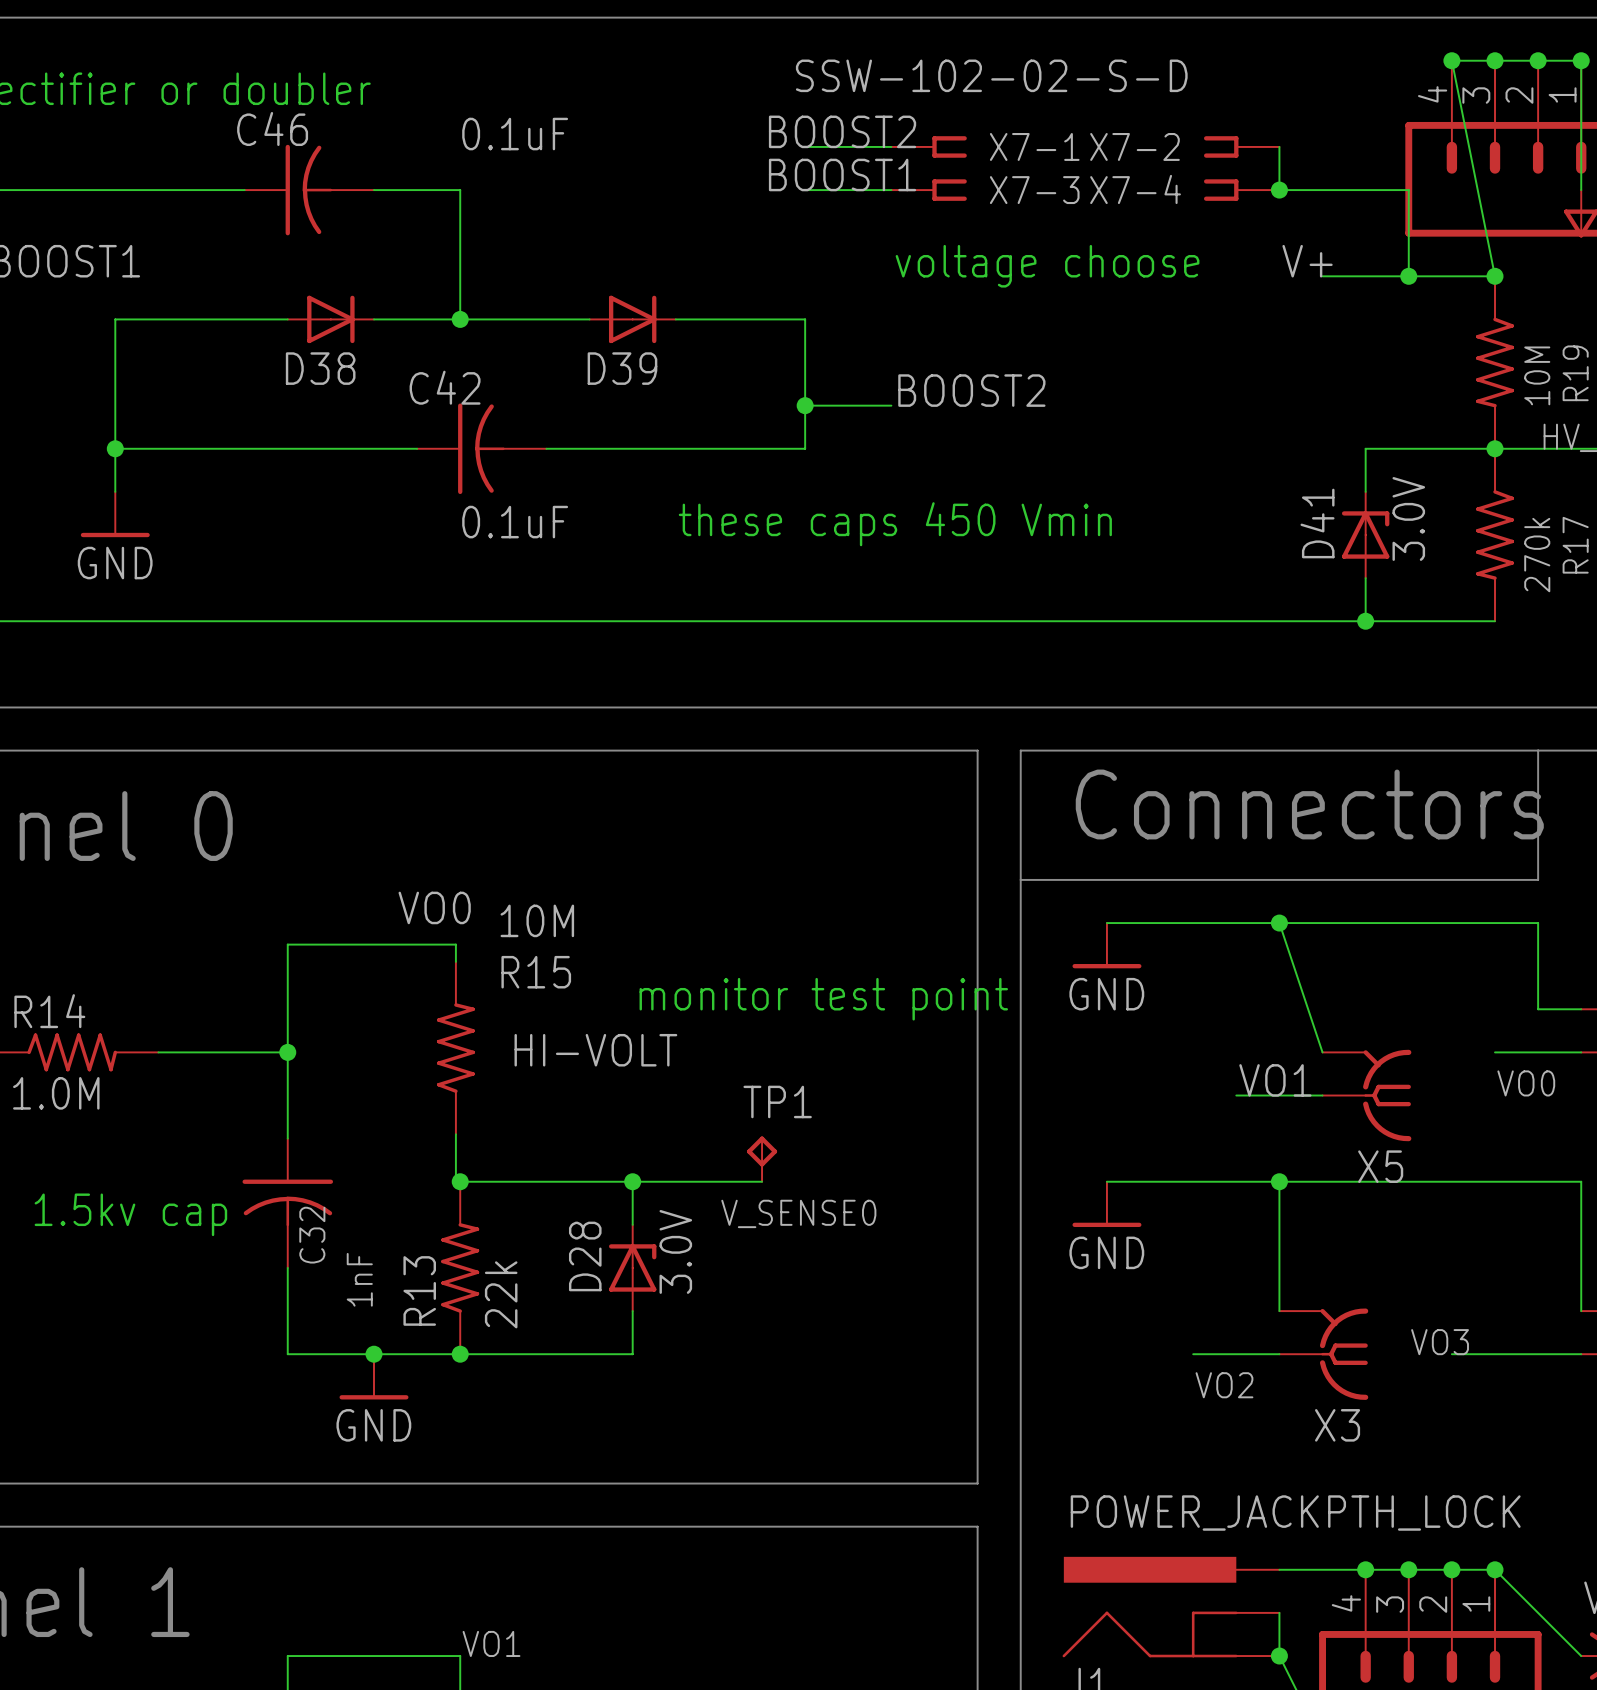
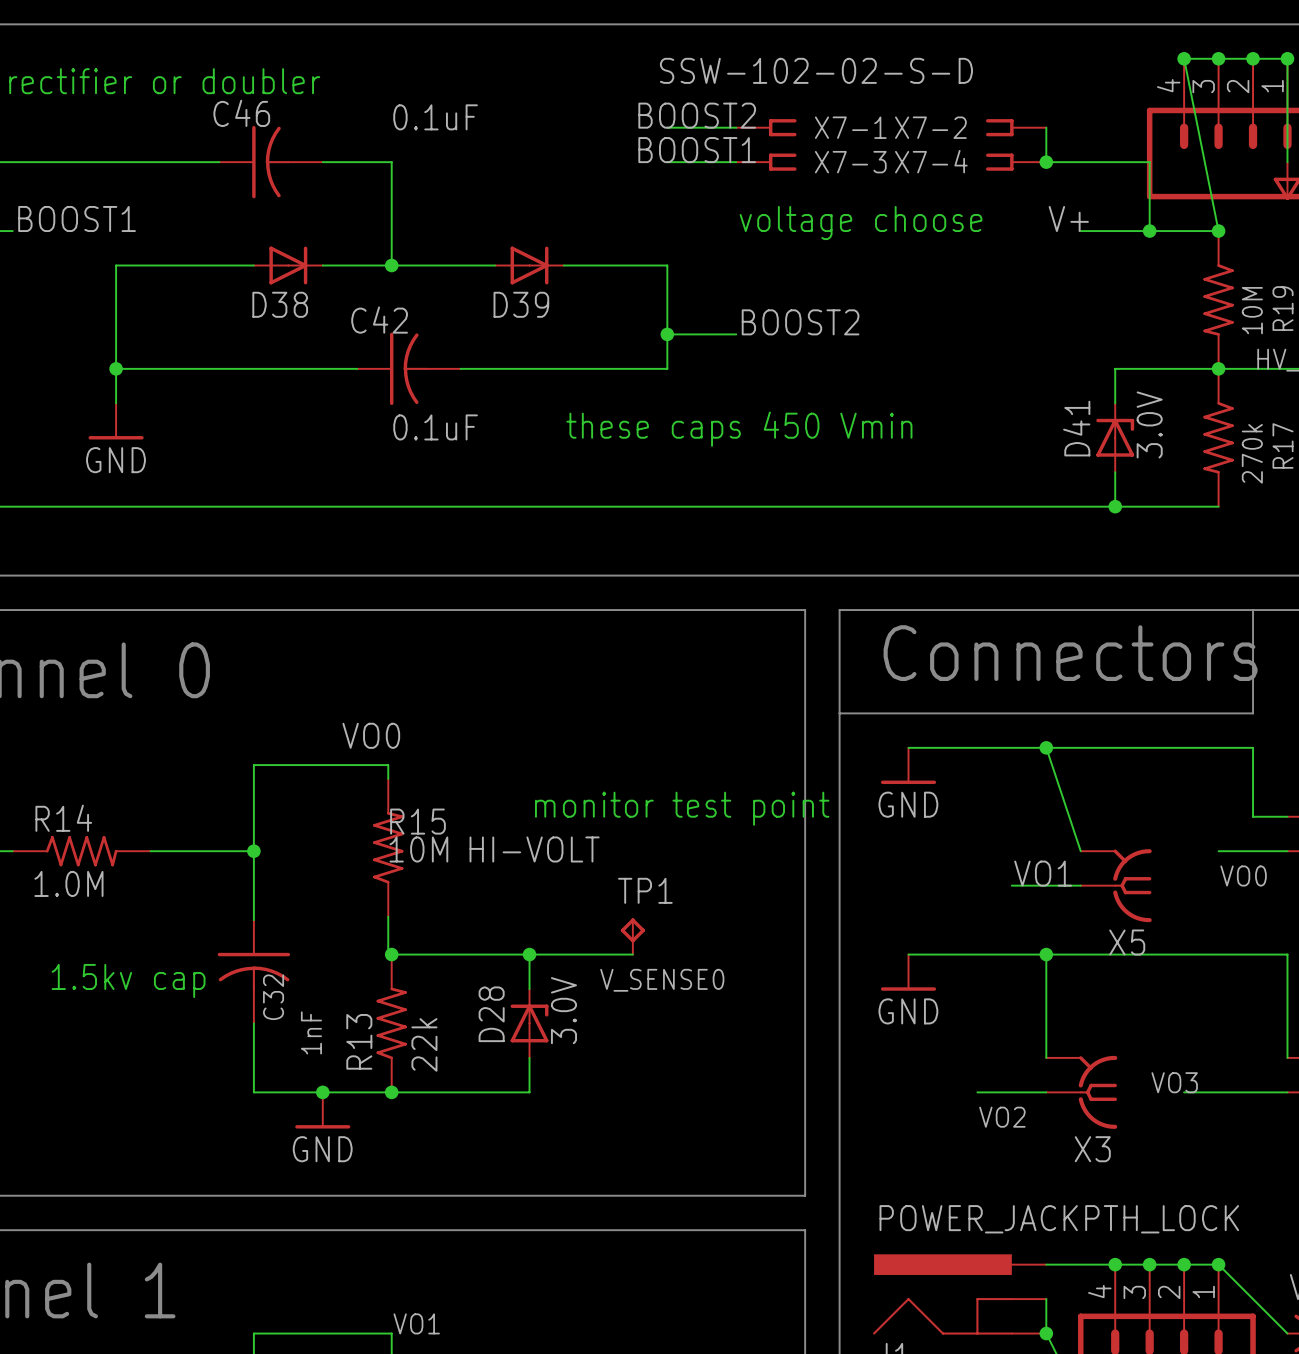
R15 value position: 10M (537, 920) -> 10M (418, 849)
R15 name position: R15 (536, 972) -> R15 (418, 821)
R15 text position: HI-VOLT (595, 1050) -> HI-VOLT (534, 849)

